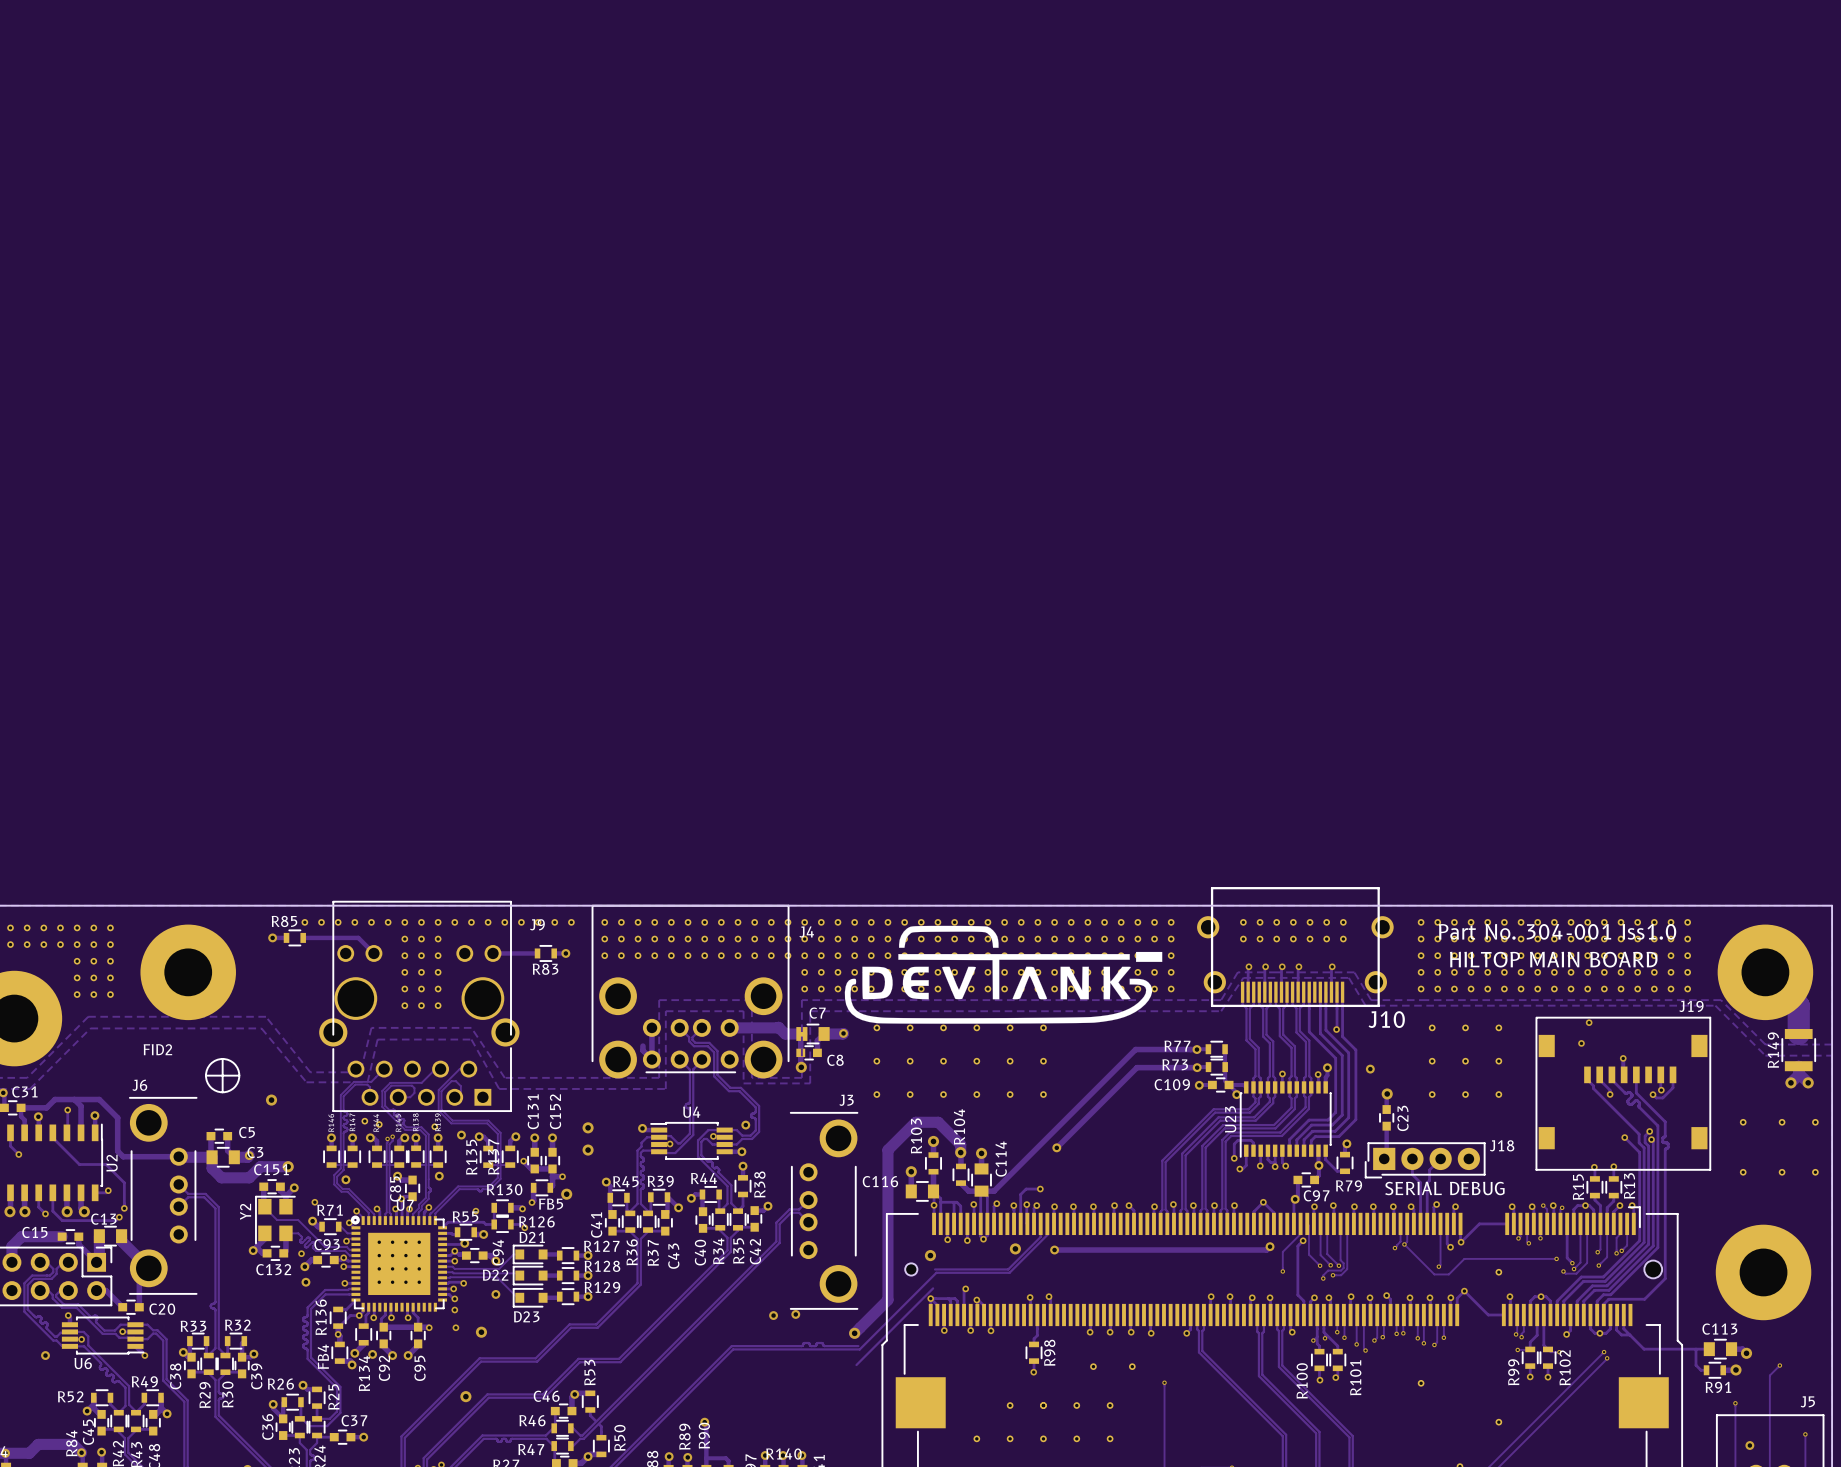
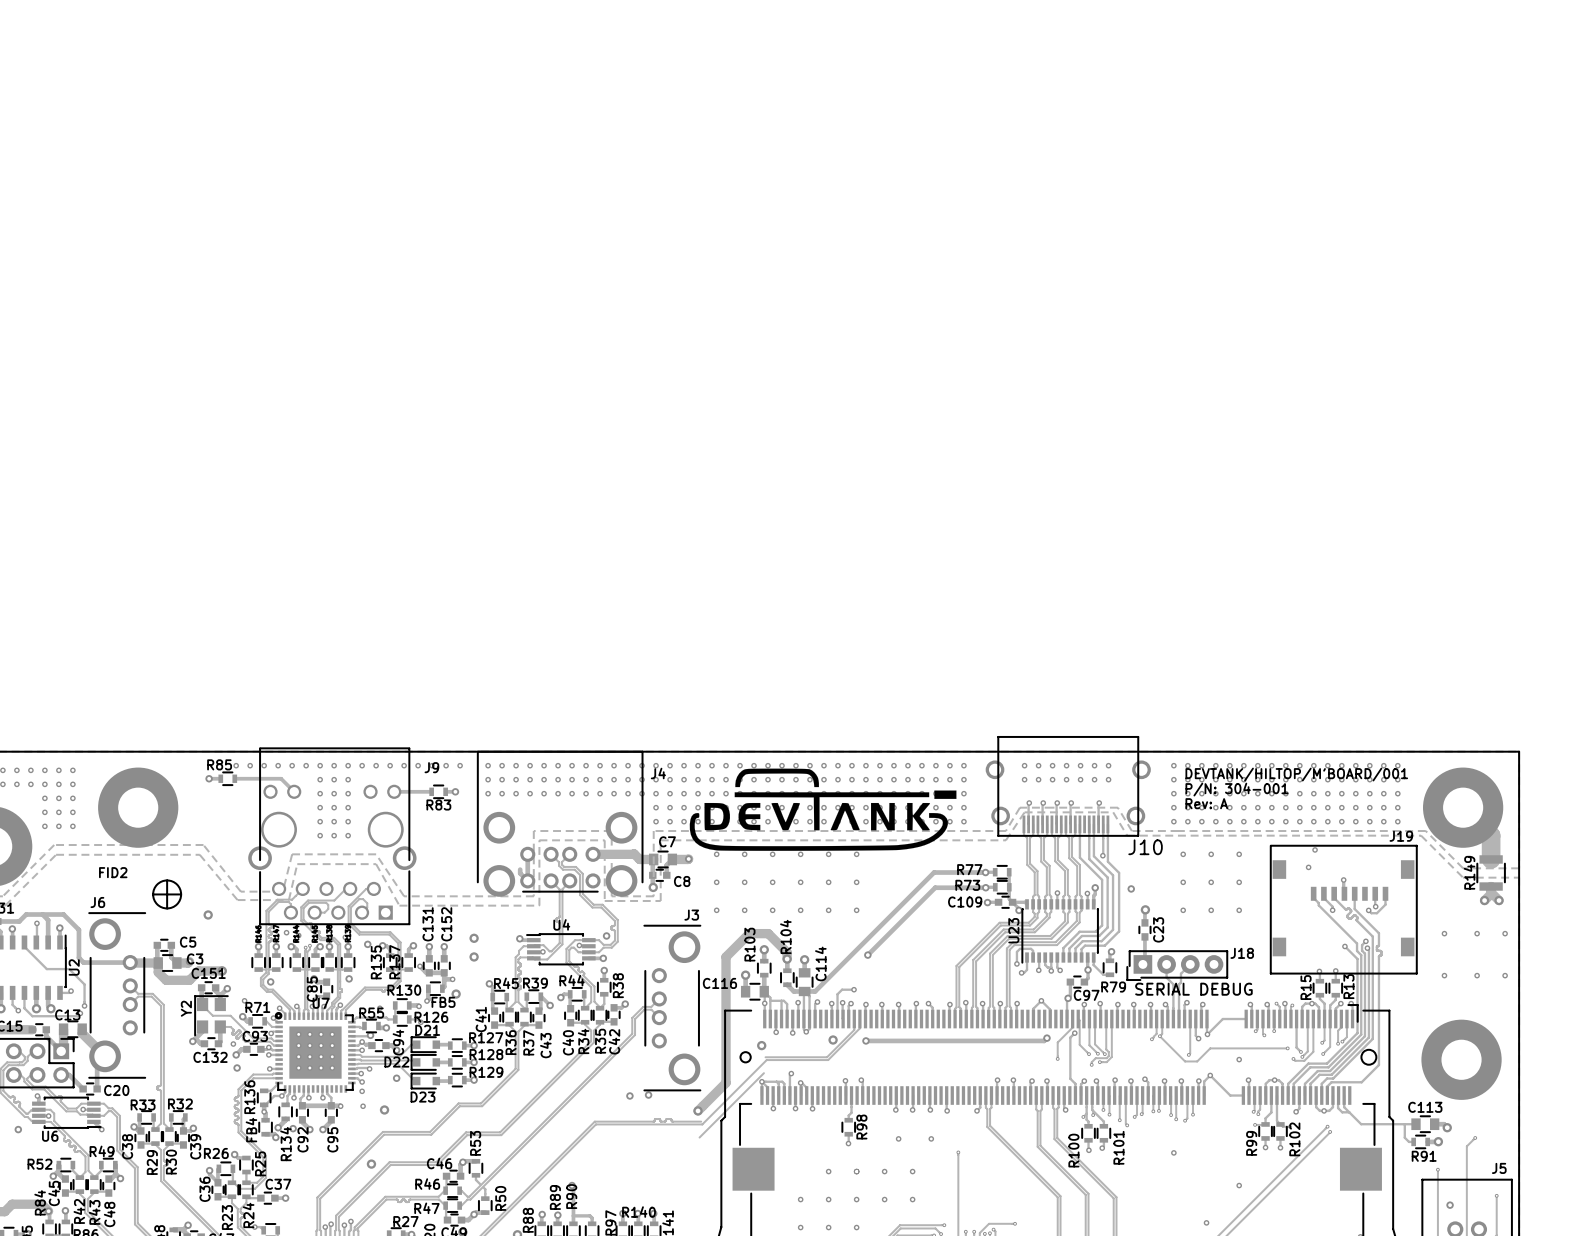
text: none -> DEVTANK/HILTOP/M'BOARD/001 (1296, 774)
text: Part No. 304-001 Iss1.0 (1557, 931) -> none
text: none -> P/N: 304-001 (1237, 789)
text: HILTOP MAIN BOARD (1553, 959) -> none
text: none -> Rev: A (1206, 803)

